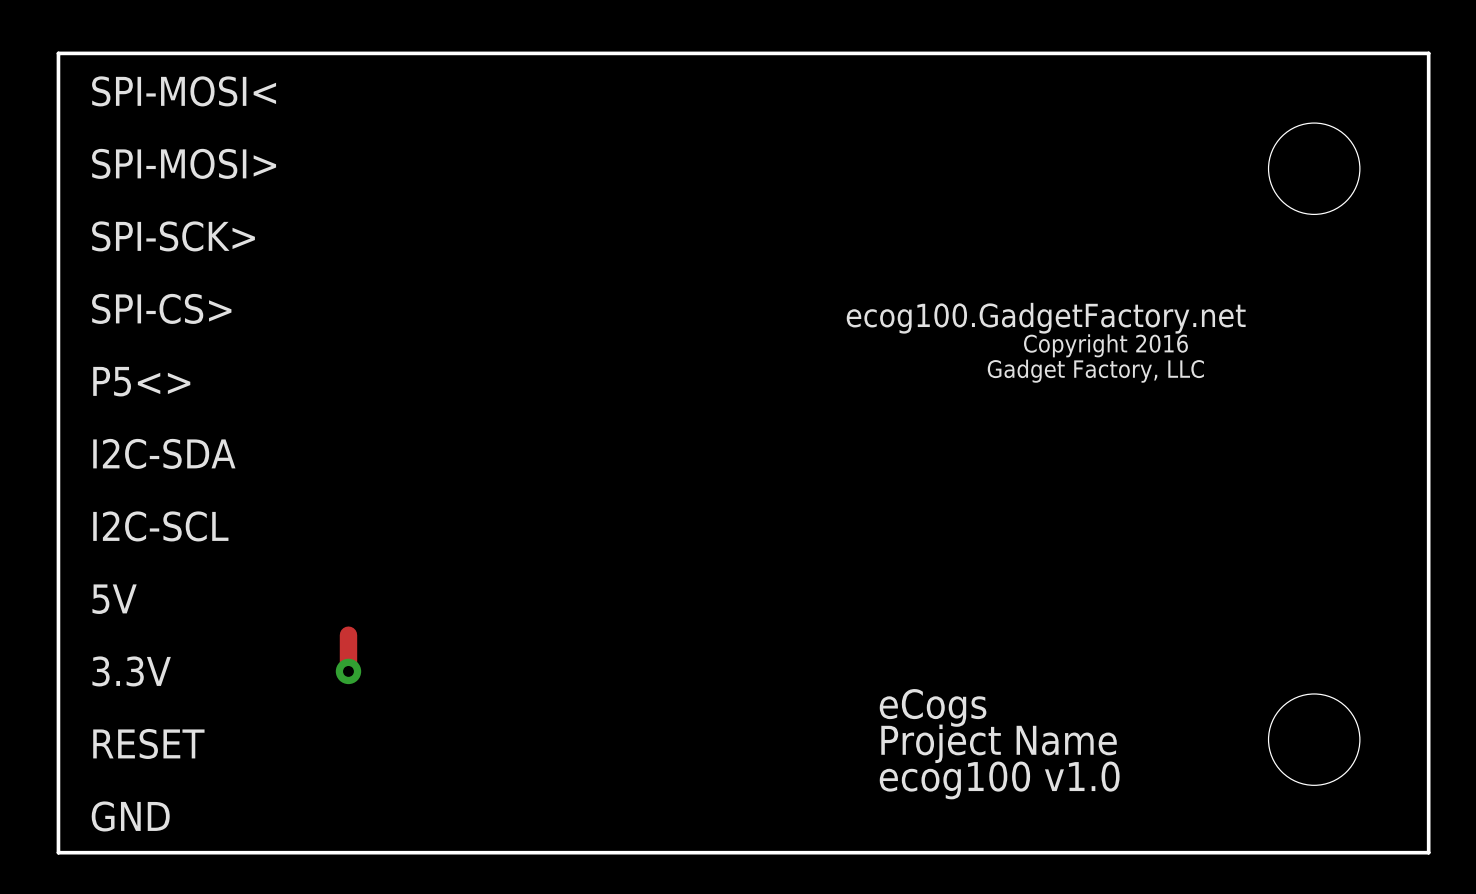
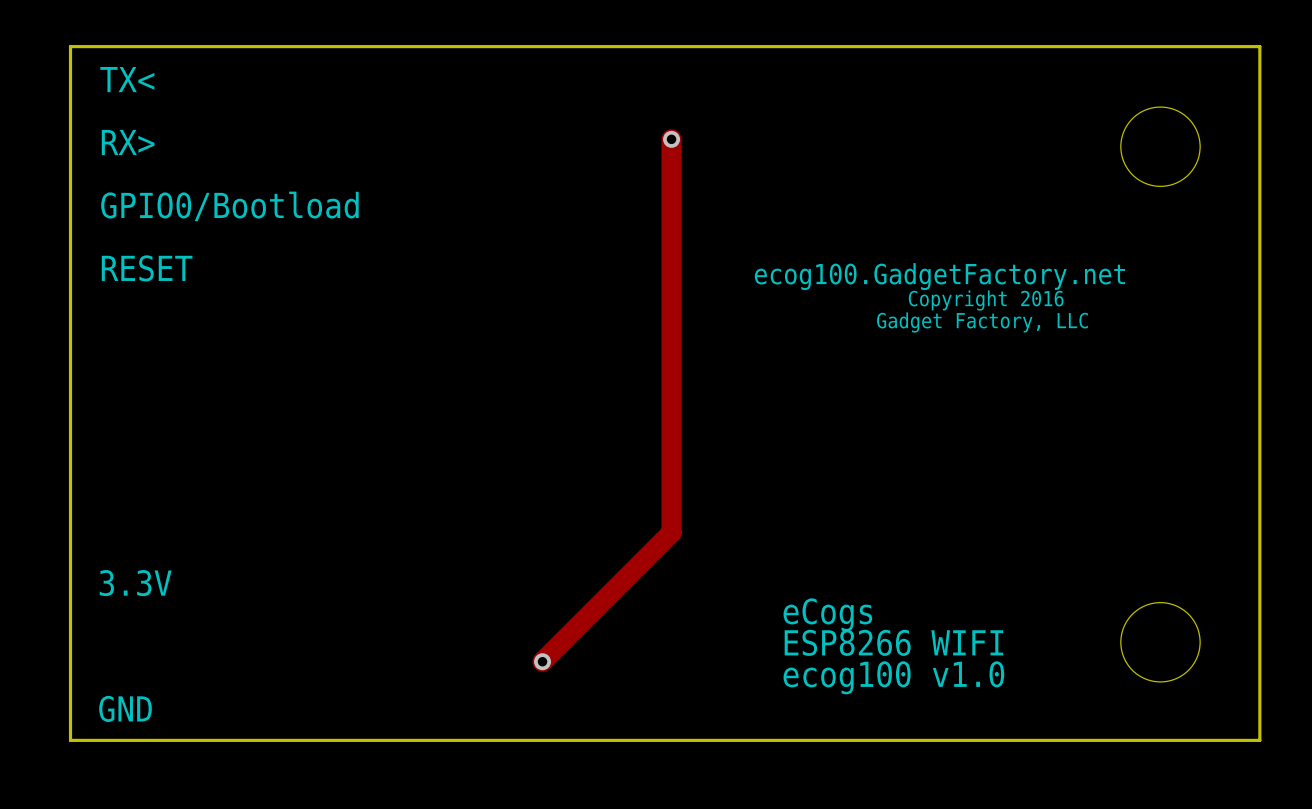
text: SPI-MOSI< (184, 91) -> TX< (127, 79)
track: none -> (671, 139) (671, 532) (542, 661)
via: none -> (671, 139)
text: SPI-MOSI> (184, 163) -> RX> (128, 142)
text: SPI-SCK> (173, 236) -> GPIO0/Bootload (229, 206)
text: SPI-CS> (161, 308) -> RESET (147, 268)
text: P5<> (141, 381) -> none
text: I2C-SDA (164, 453) -> none
text: I2C-SCL (160, 526) -> none
text: 5V (114, 599) -> none
track: (348, 635) (348, 671) -> none
via: (348, 671) -> none
text: RESET (148, 743) -> none
text: Project Name (999, 743) -> ESP8266 WIFI (893, 642)
via: none -> (542, 661)

